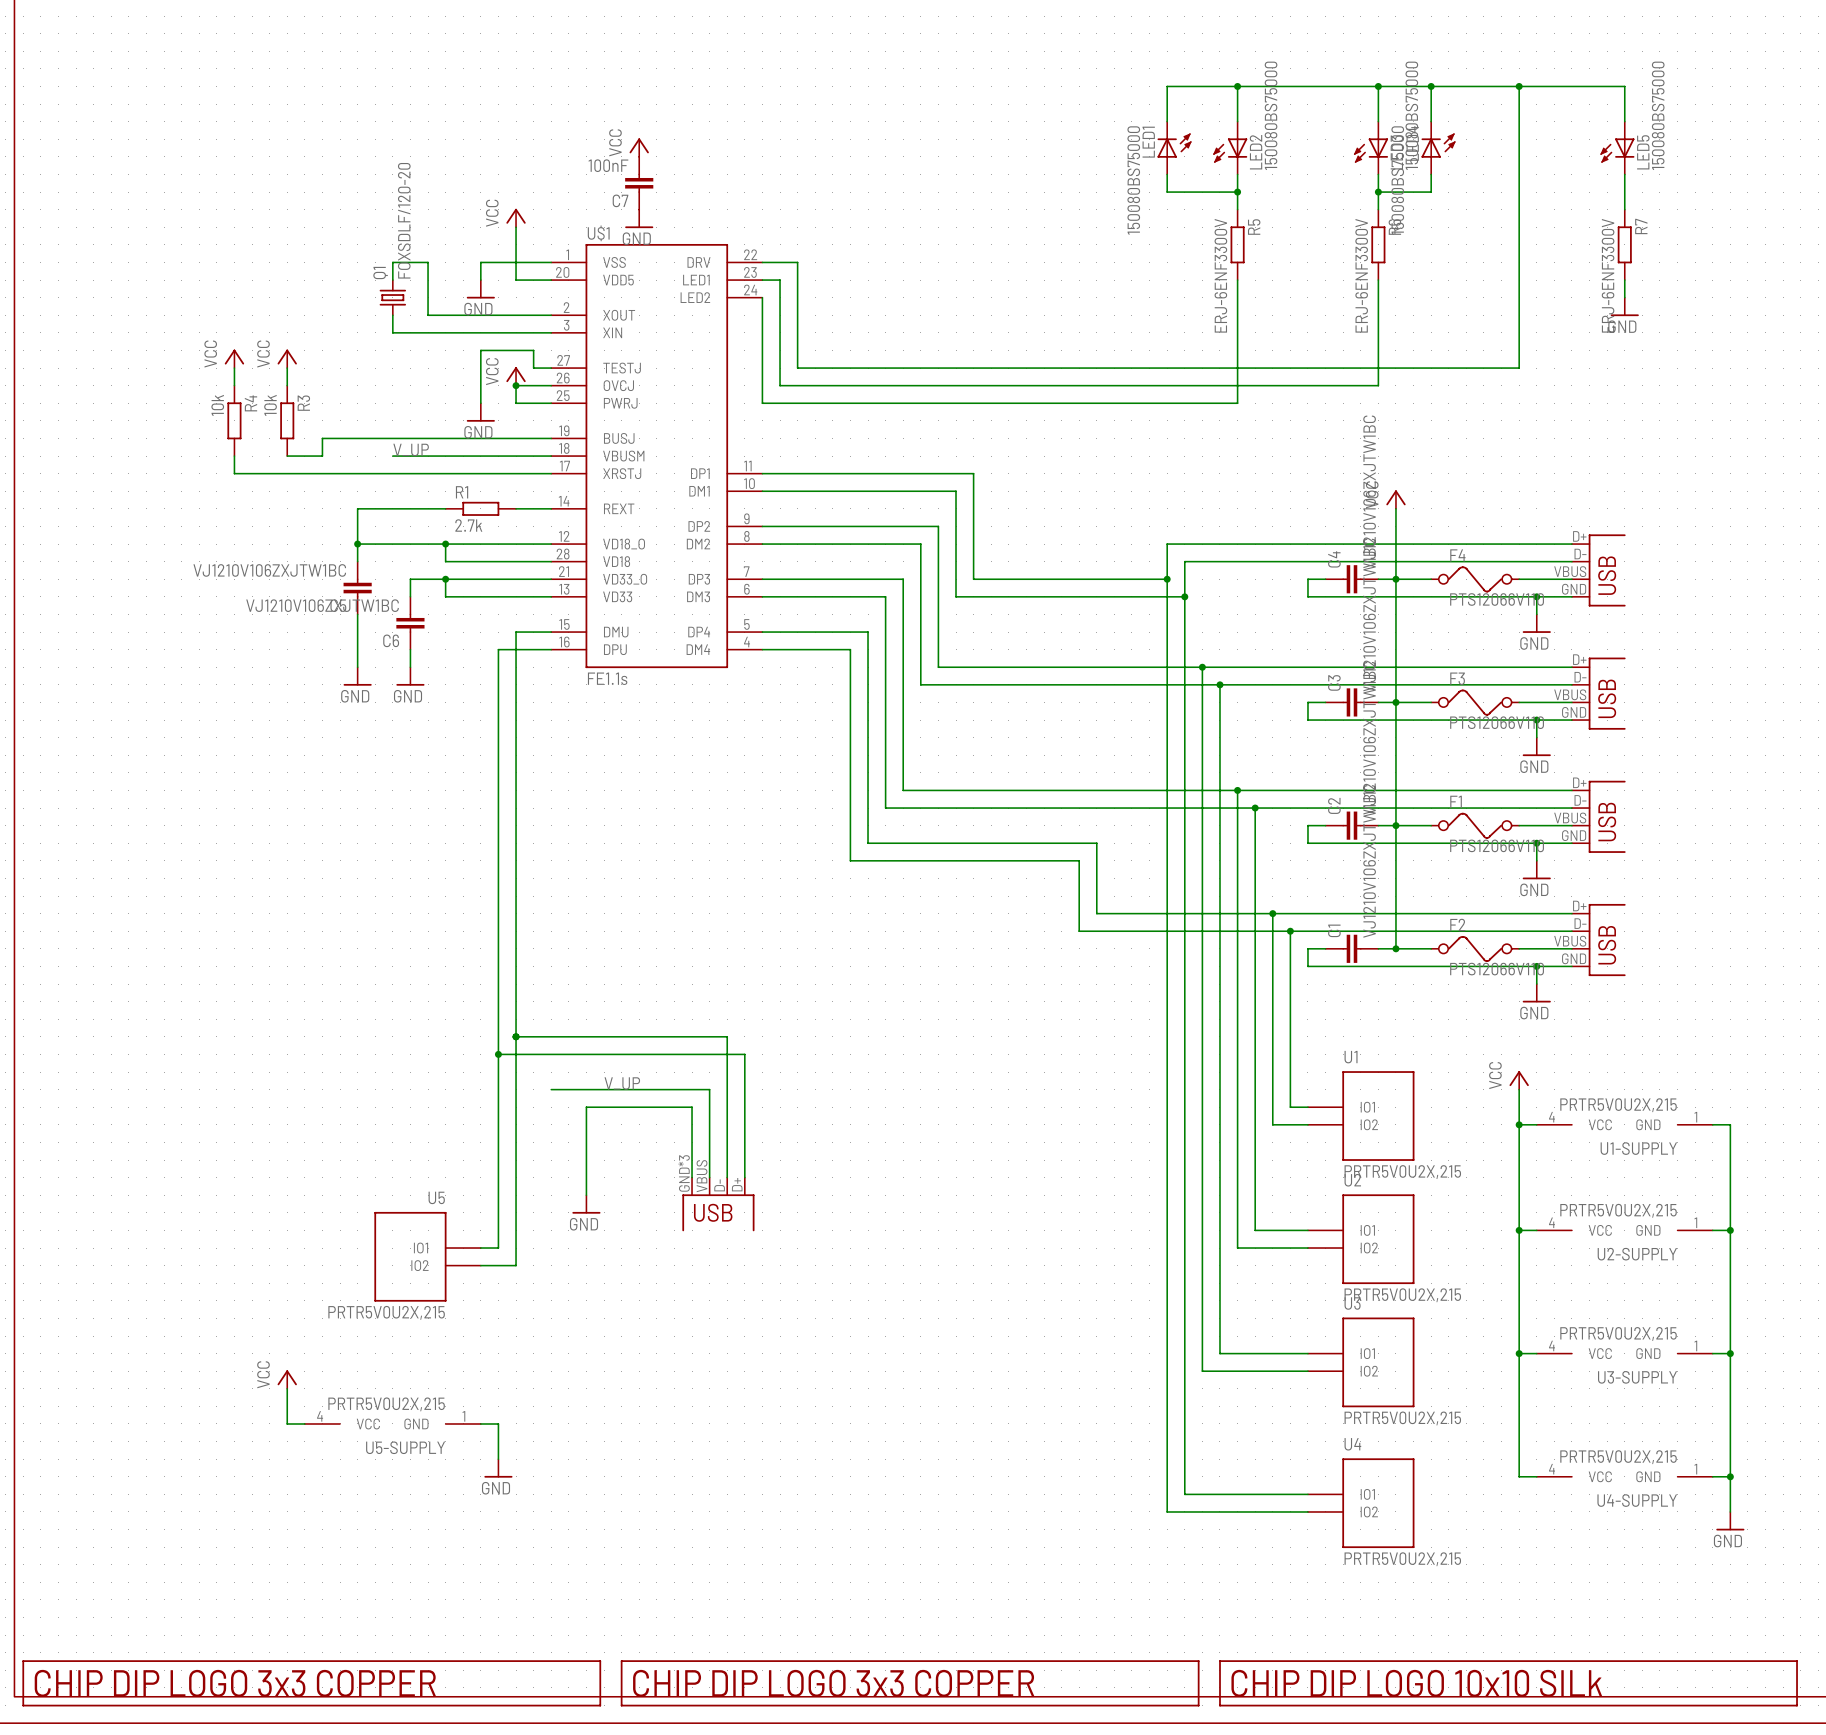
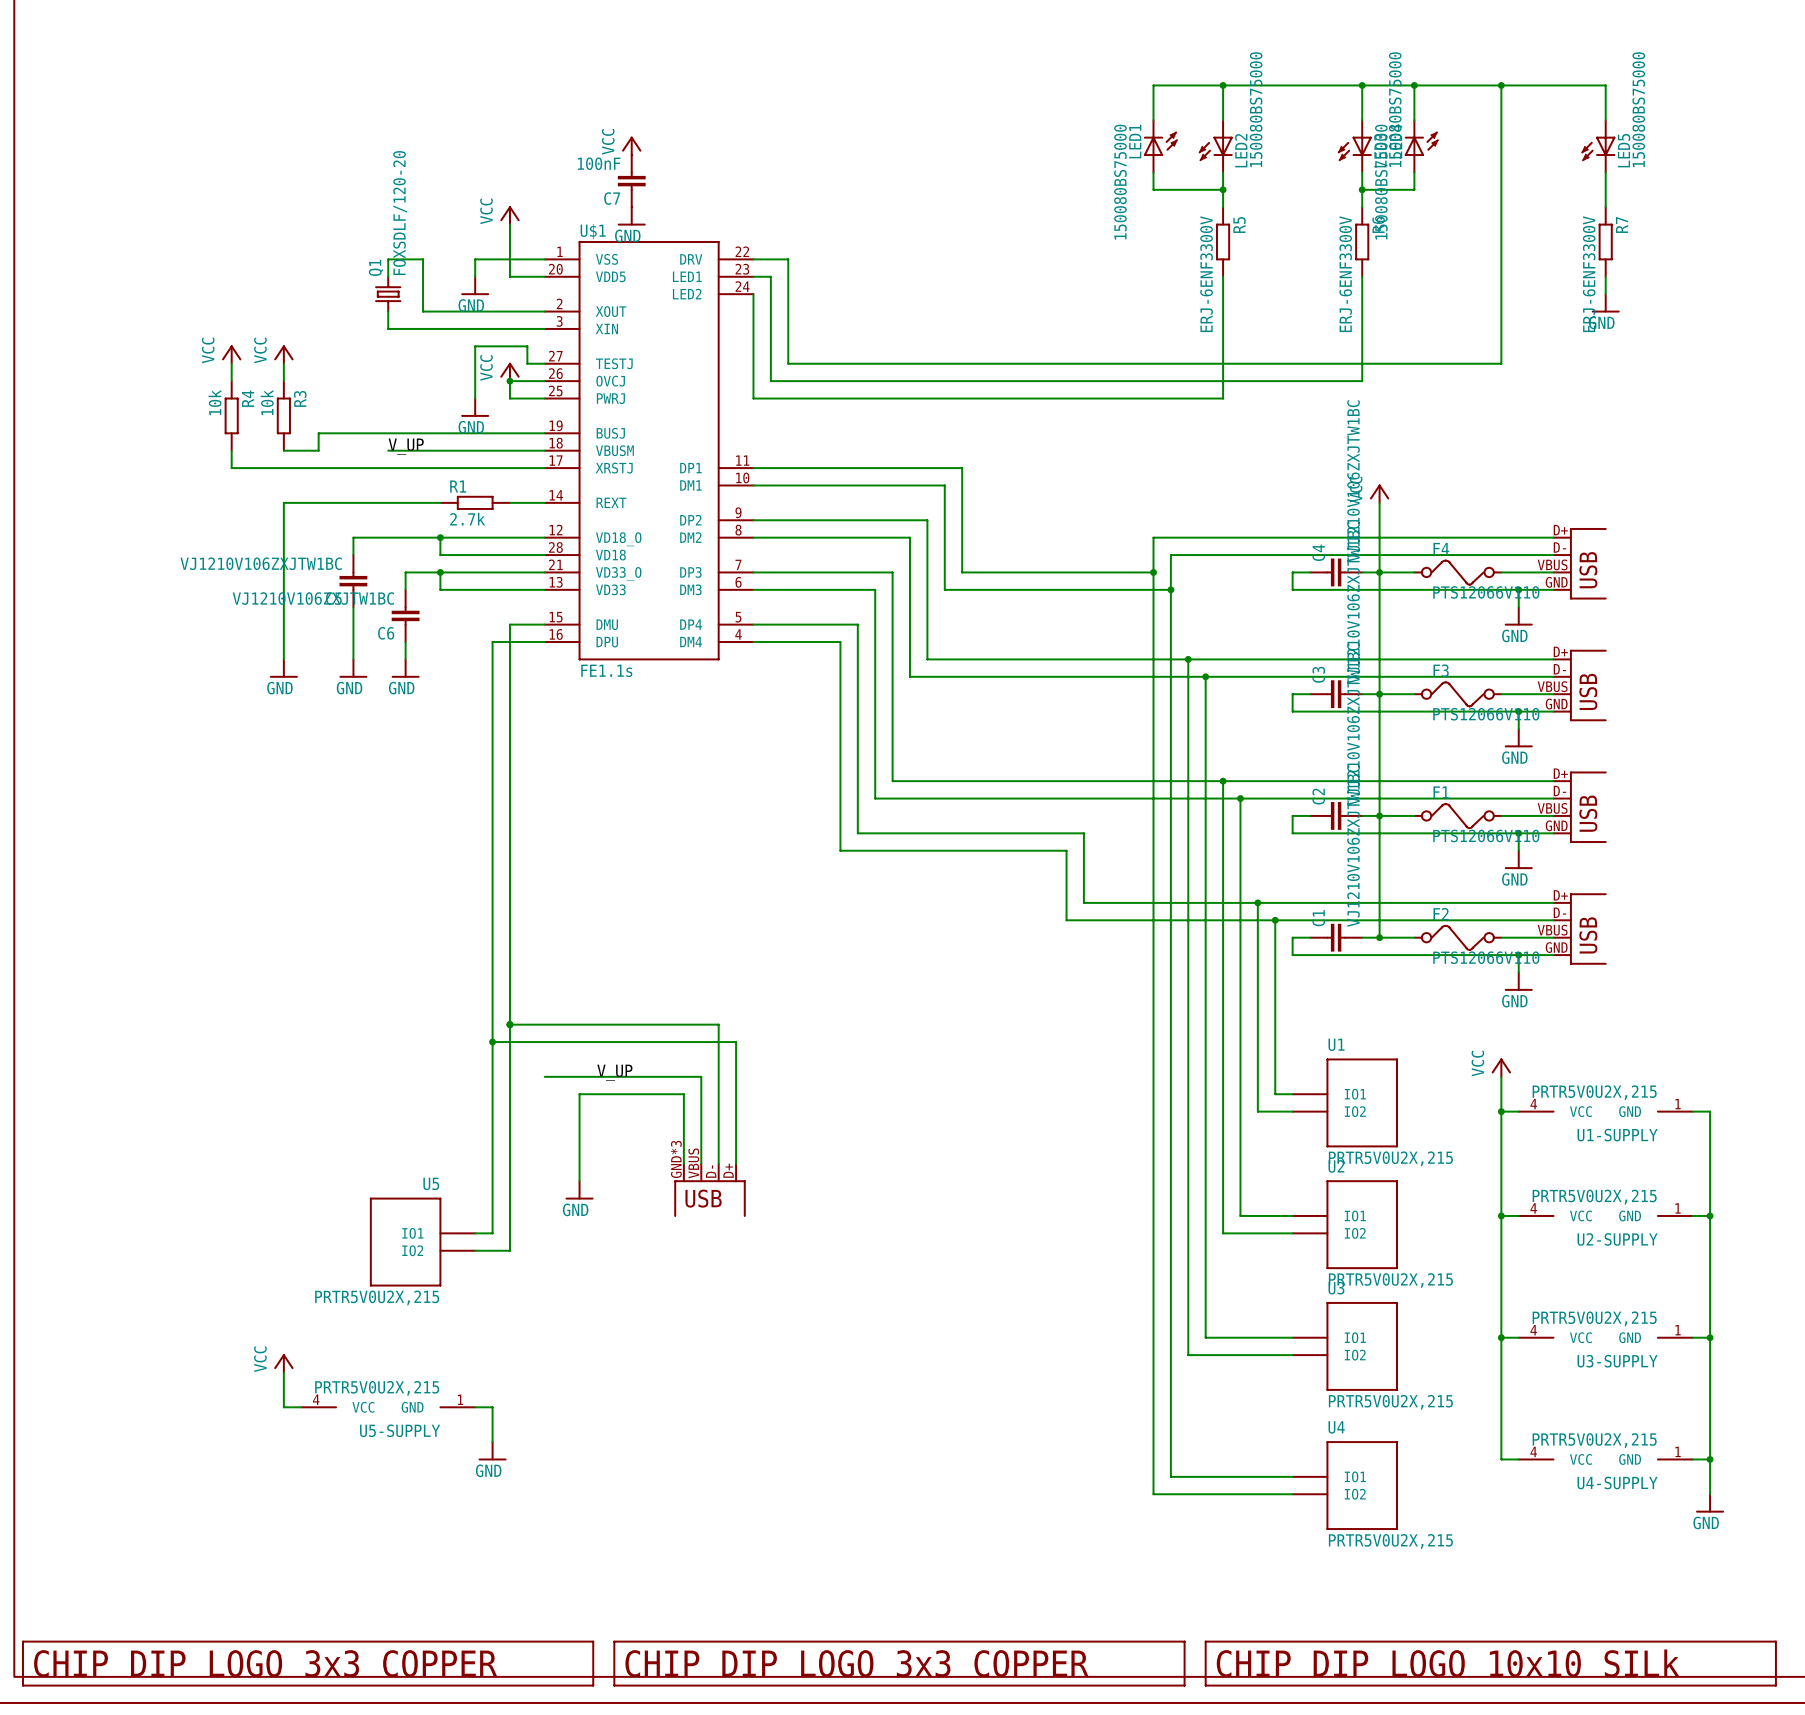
wire: (357, 508) (357, 544) -> (353, 502) (283, 502) (283, 659)
junction: (357, 544) -> none
power symbol: none -> GND (283, 668)

